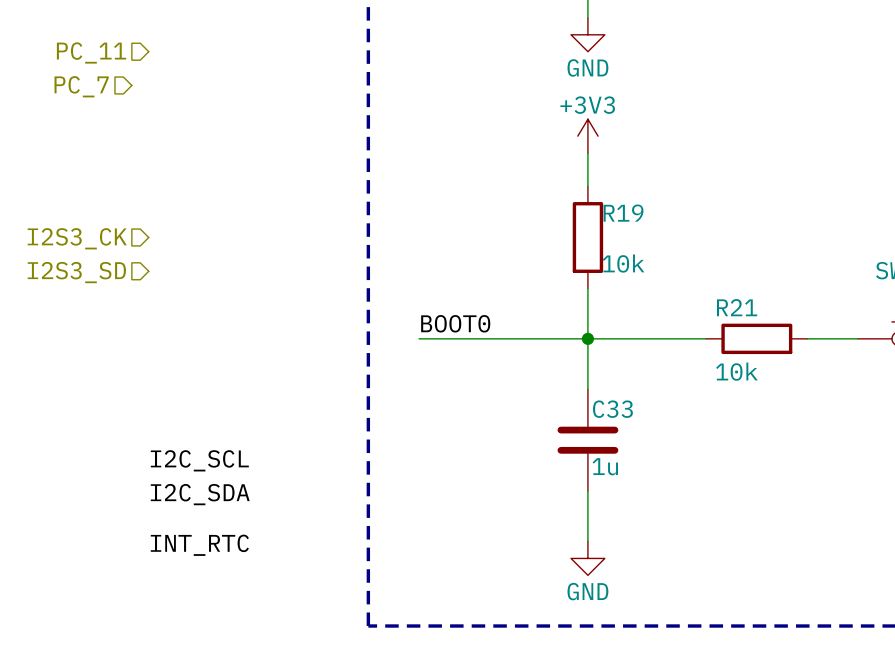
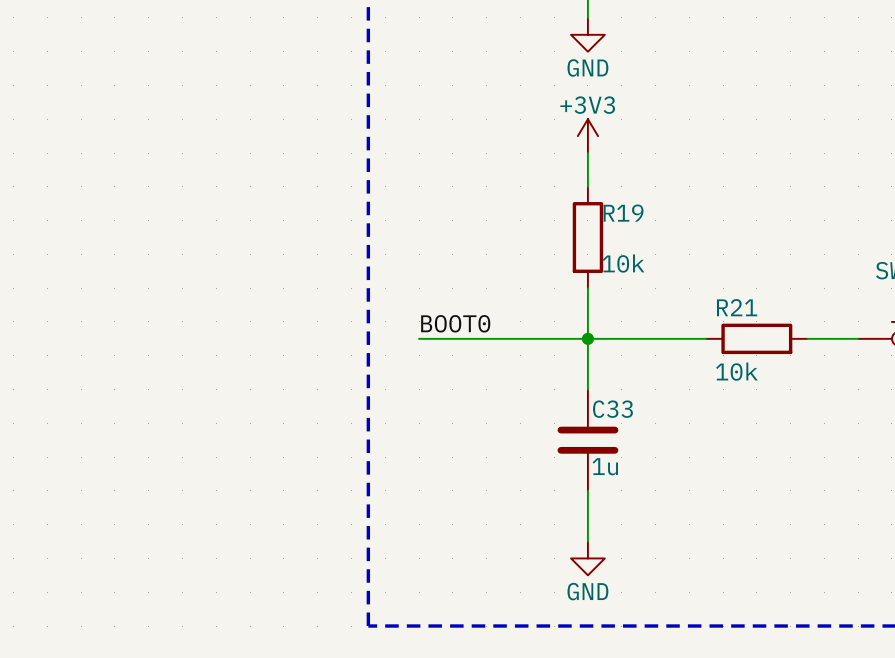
hierarchical label: PC_11 (91, 52) -> none
hierarchical label: PC_7 (81, 86) -> none
hierarchical label: I2S3_CK (77, 238) -> none
hierarchical label: I2S3_SD (76, 272) -> none
label: I2C_SCL (199, 460) -> none
label: I2C_SDA (200, 494) -> none
label: INT_RTC (199, 545) -> none

